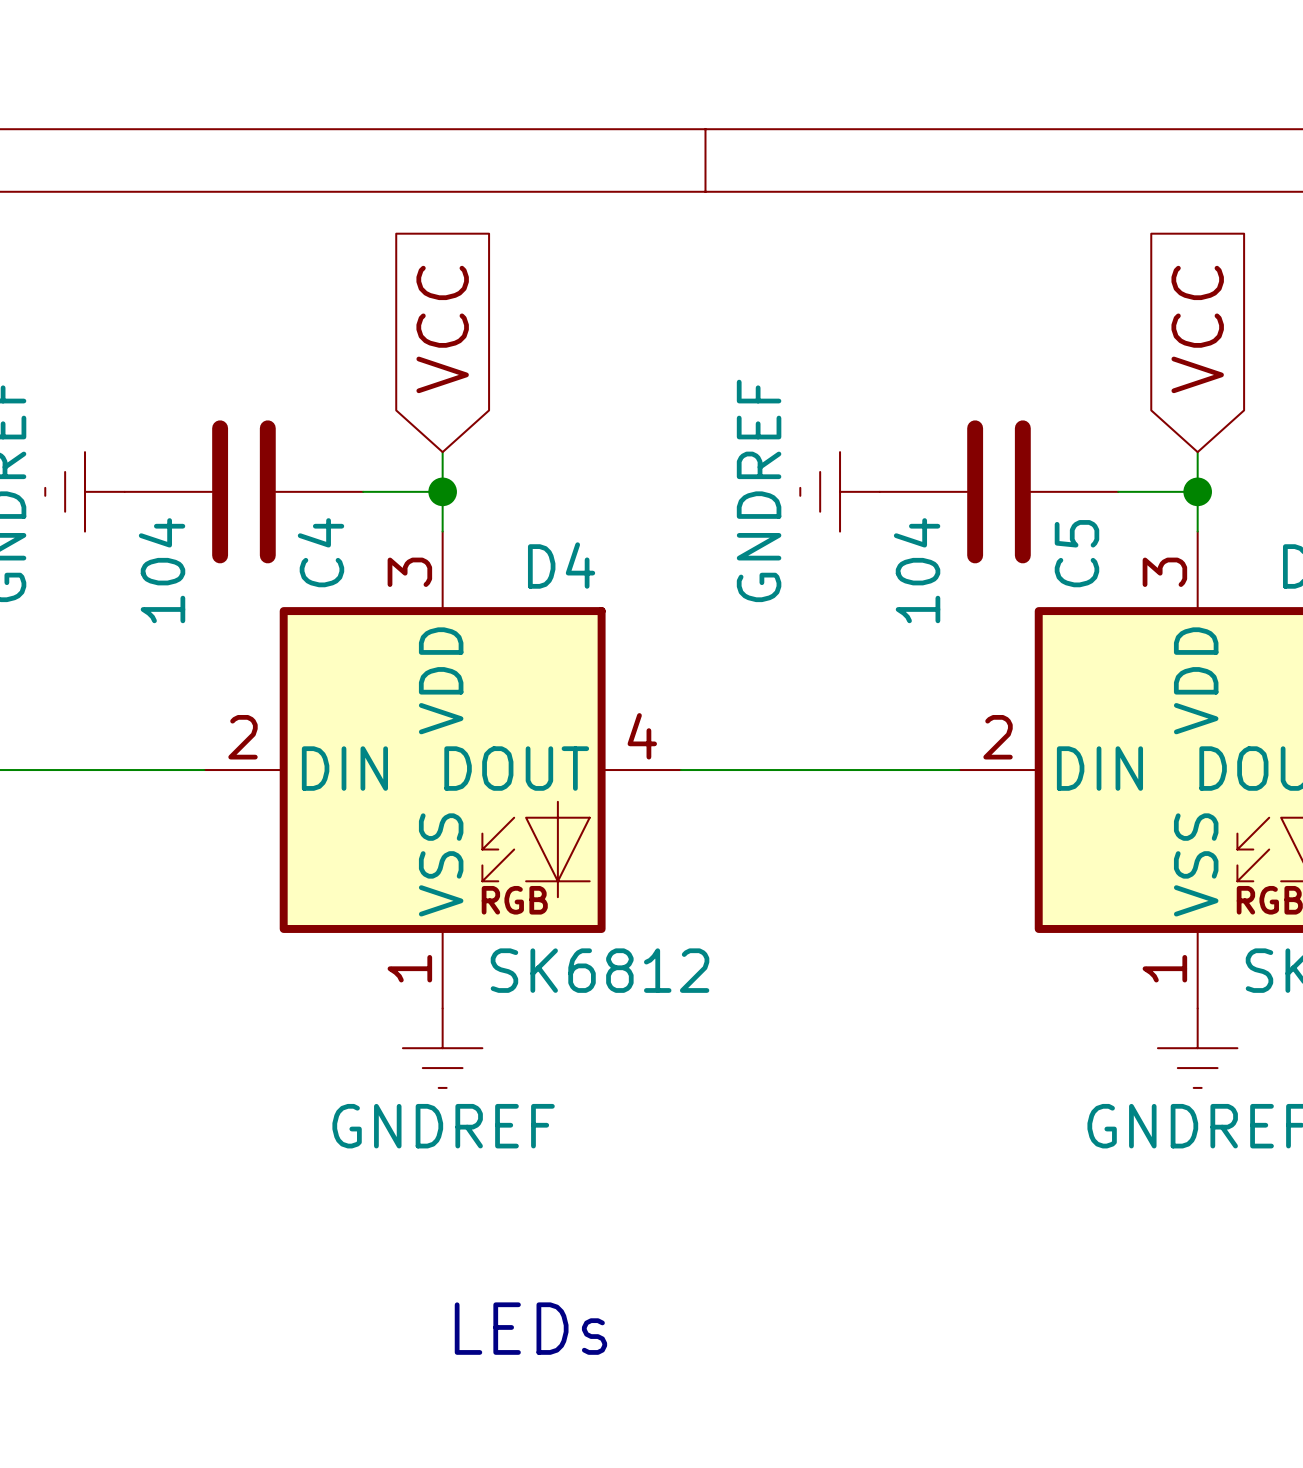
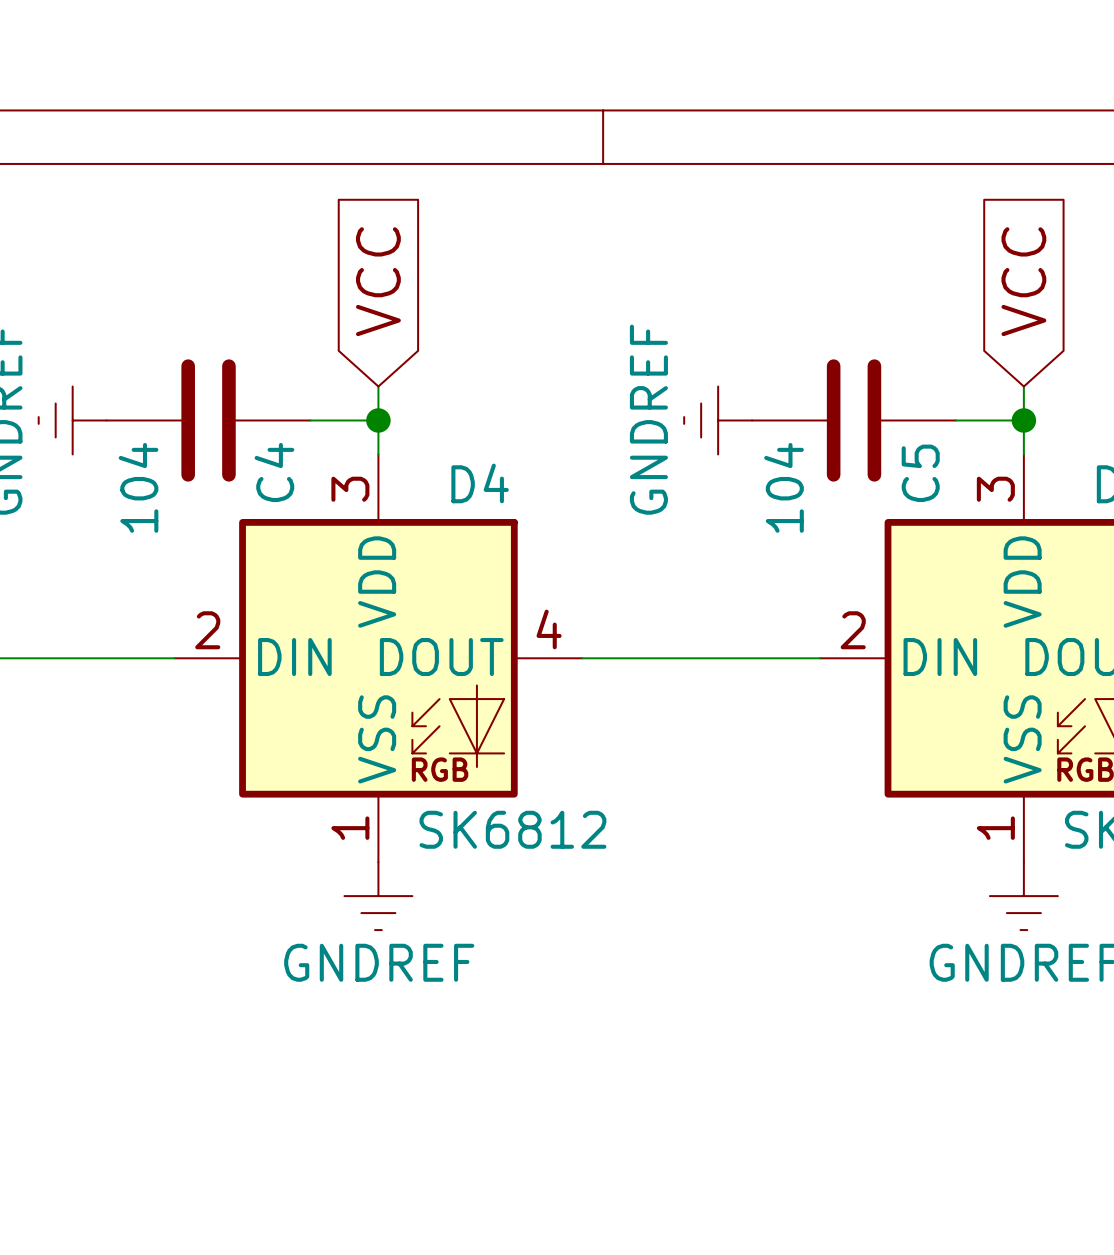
text: LEDs (530, 1328) -> none

